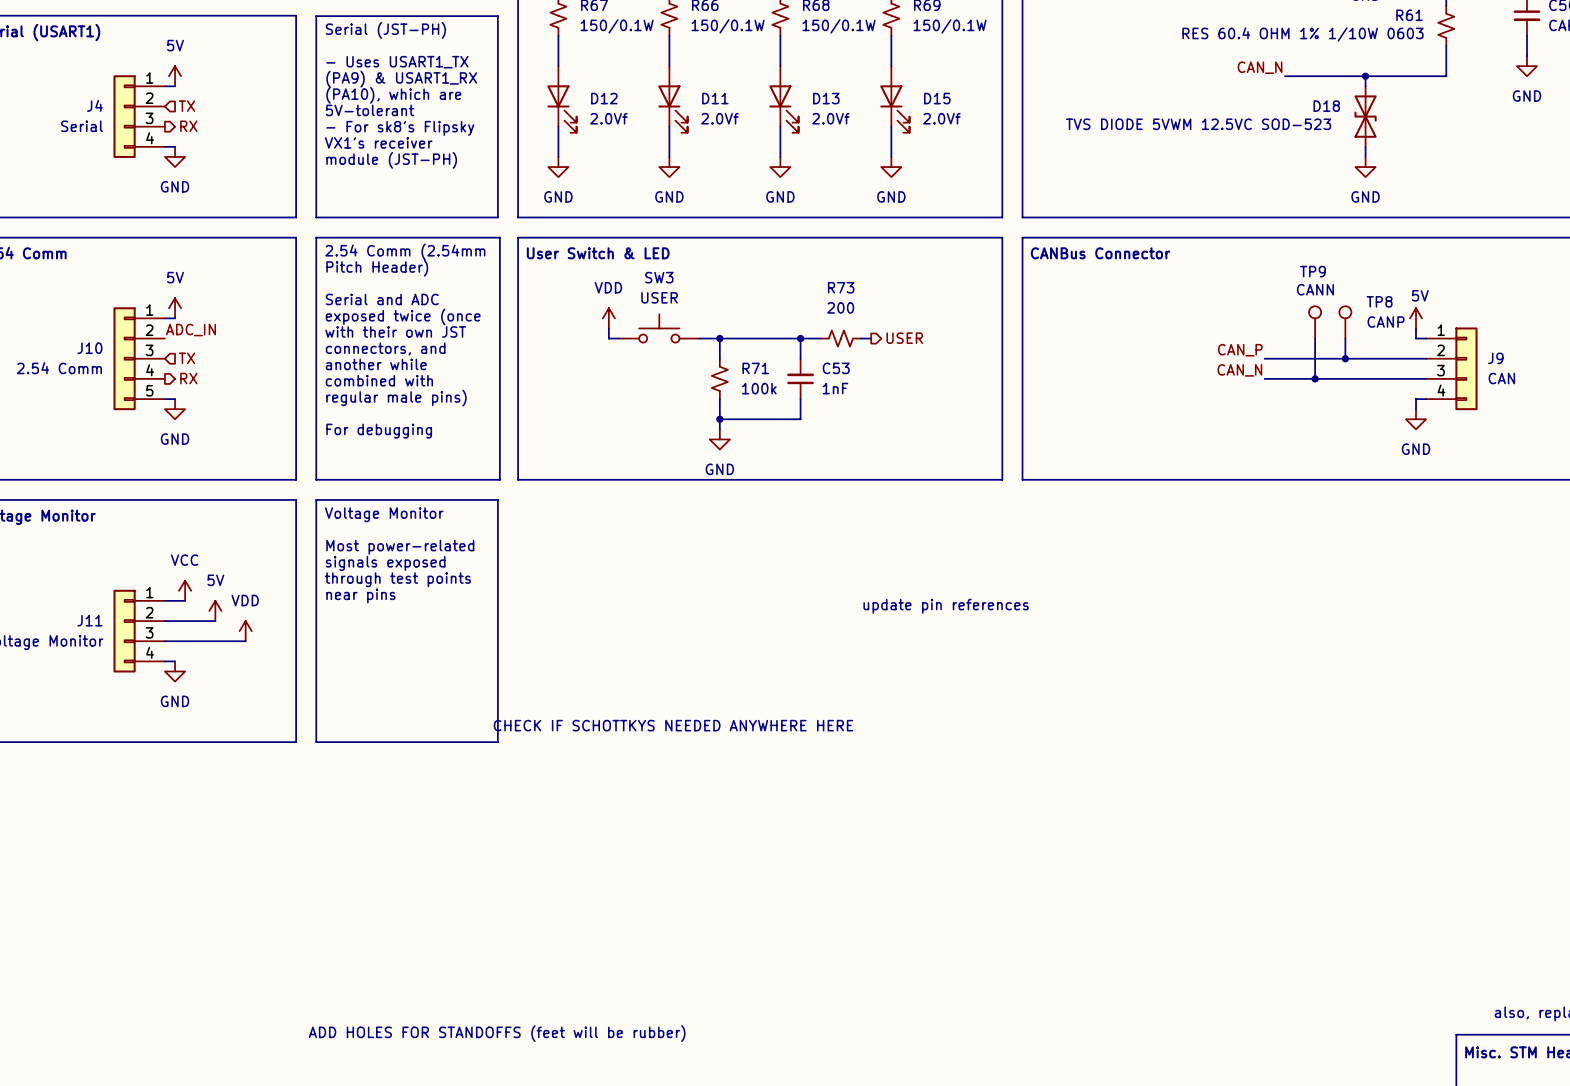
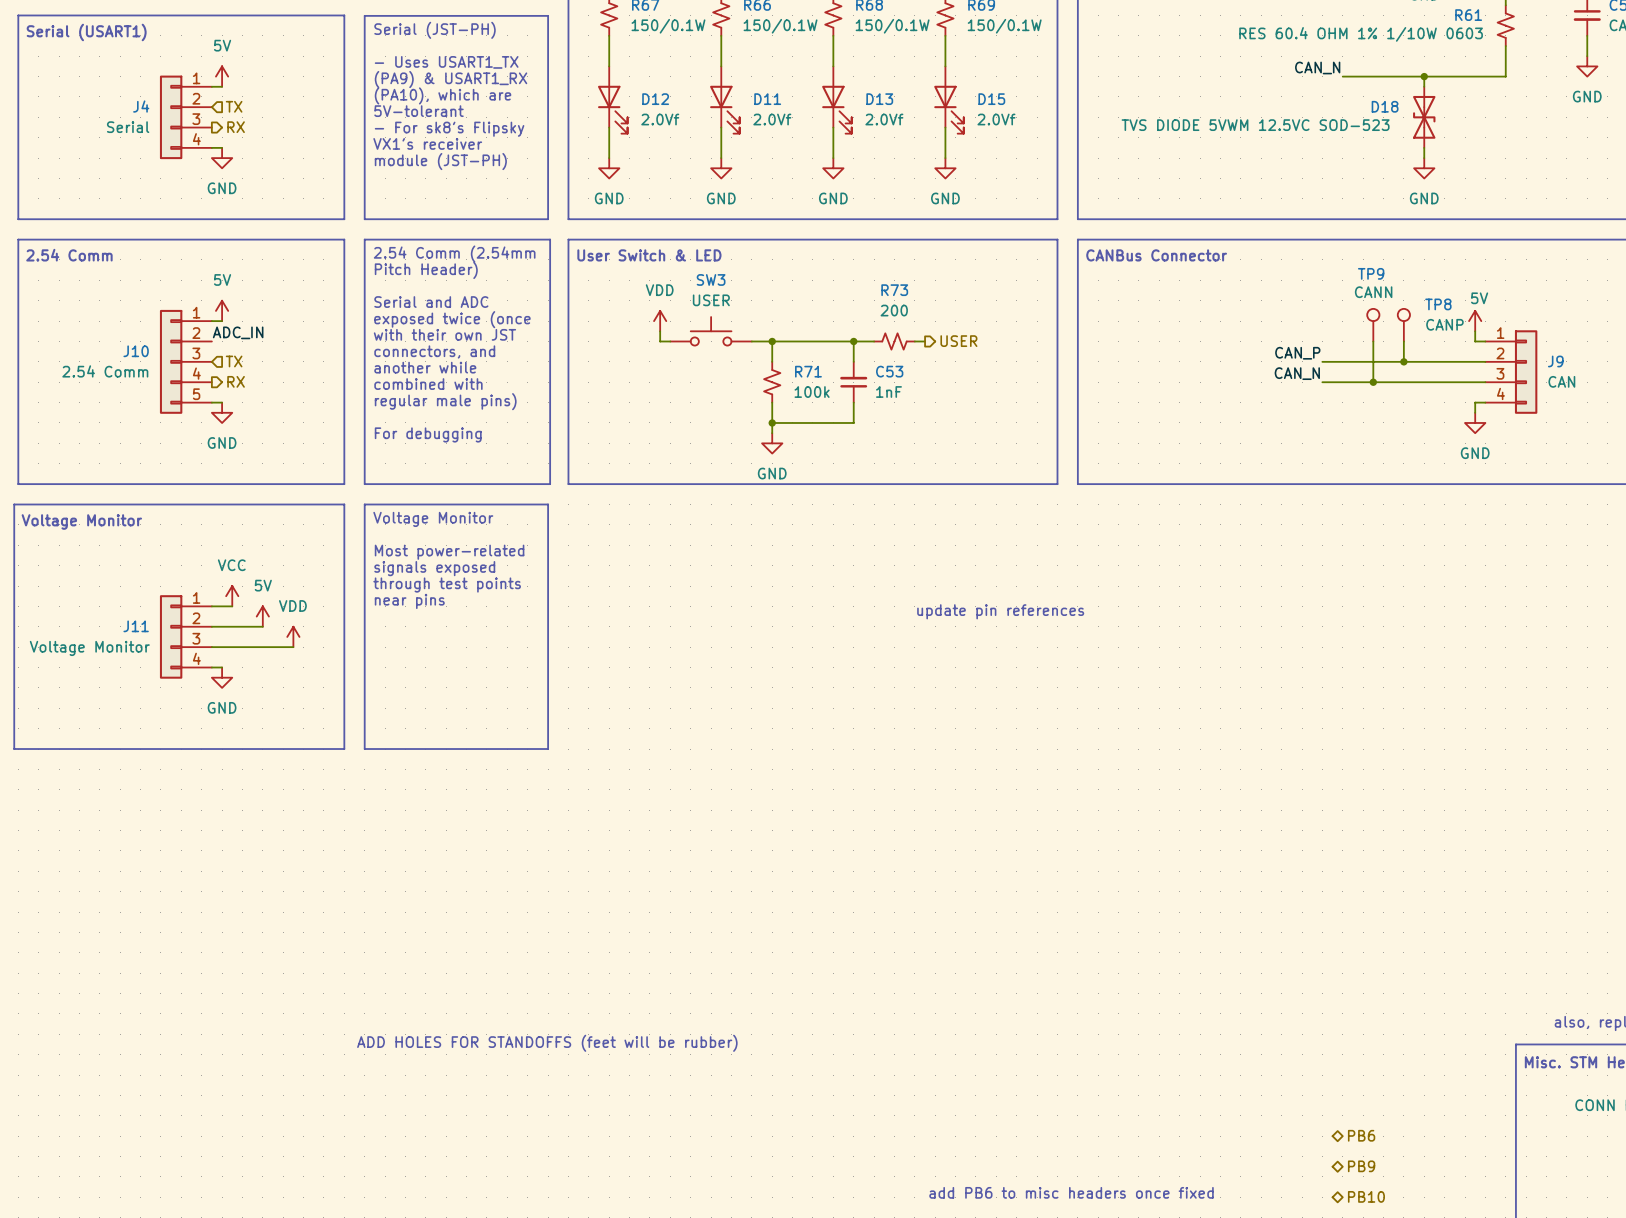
text: CHECK IF SCHOTTKYS NEEDED ANYWHERE HERE (673, 725) -> none

